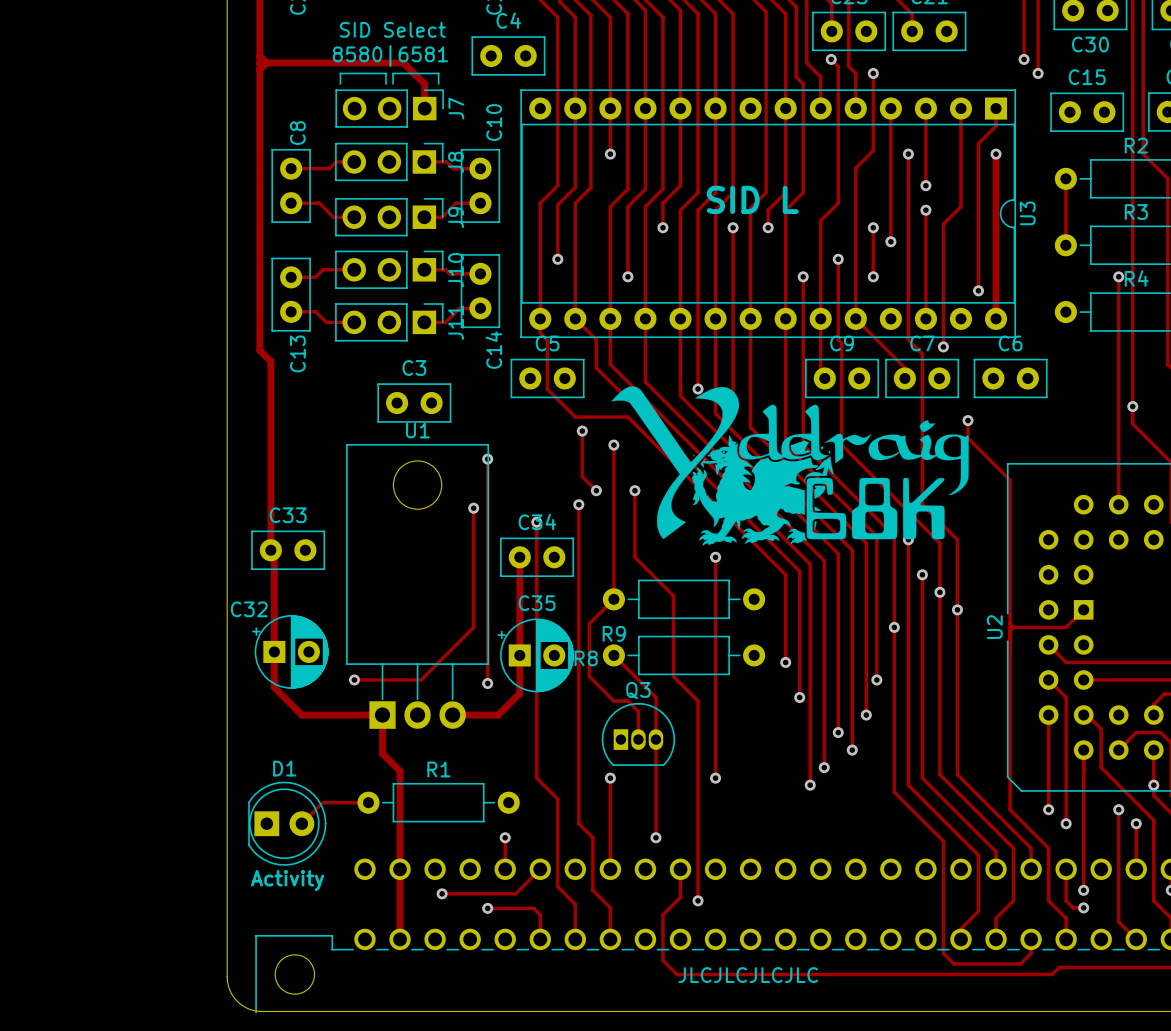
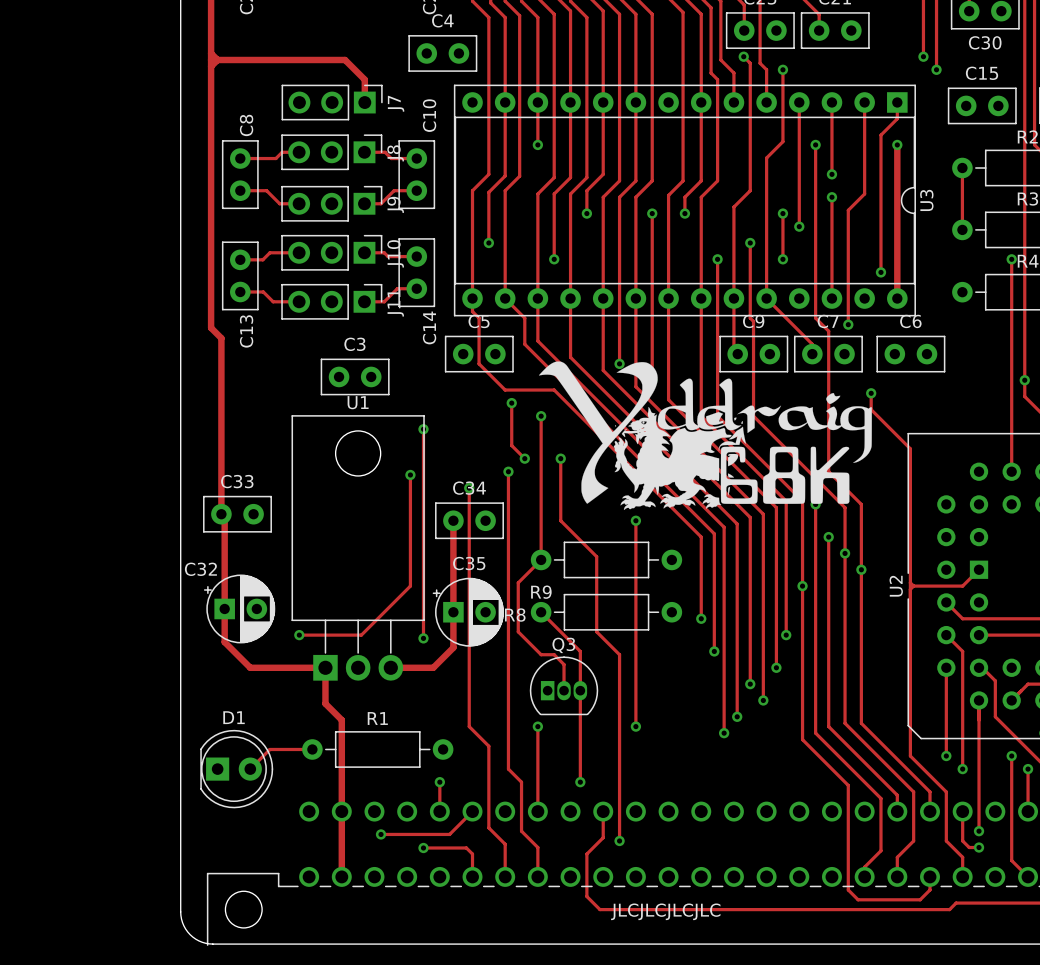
text: SID Select (392, 29) -> none
text: 8580|6581 (390, 56) -> none
line: (340, 83) (340, 73) (386, 73) (386, 83) -> none
line: (393, 83) (393, 73) (438, 73) (438, 83) -> none
text: SID L (752, 199) -> none
text: Activity (287, 880) -> none

